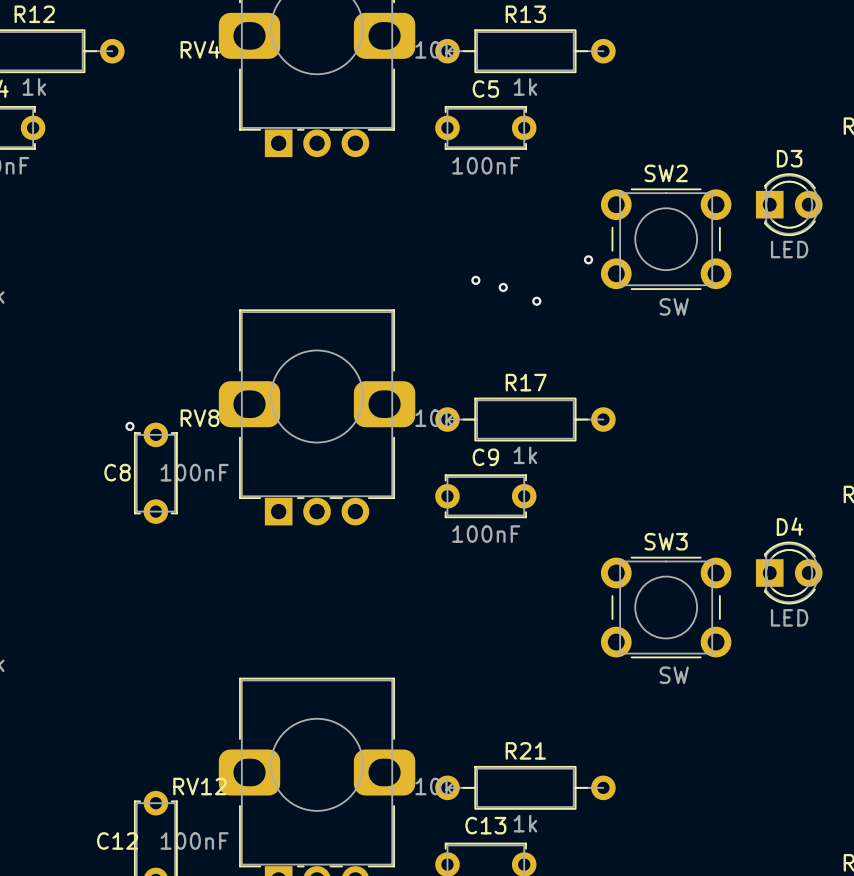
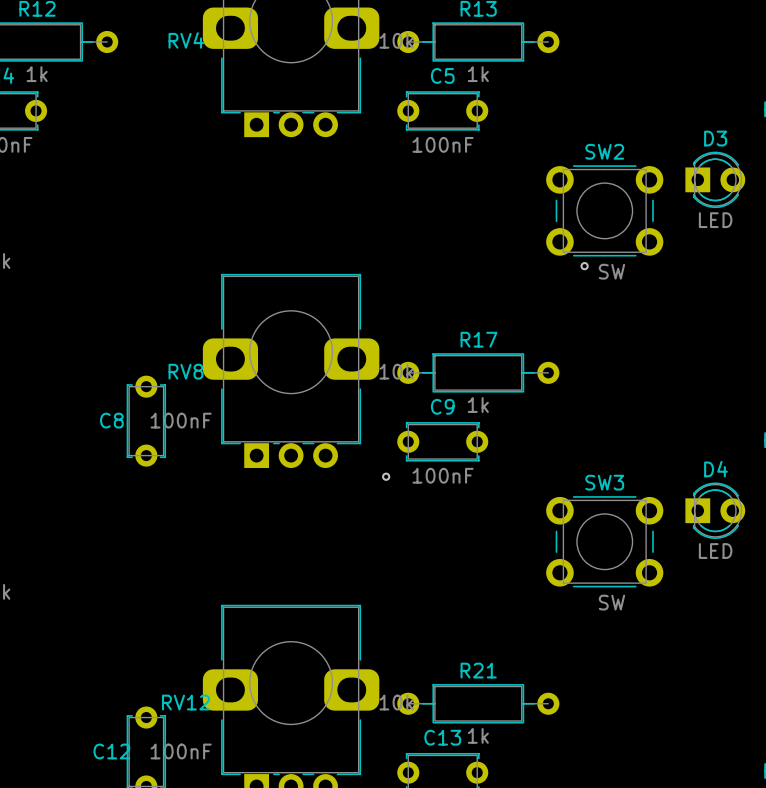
via: (588, 259) -> none
via: (475, 280) -> none
via: (503, 287) -> none
via: none -> (584, 266)
via: (536, 301) -> none
via: (129, 426) -> none
via: none -> (386, 476)

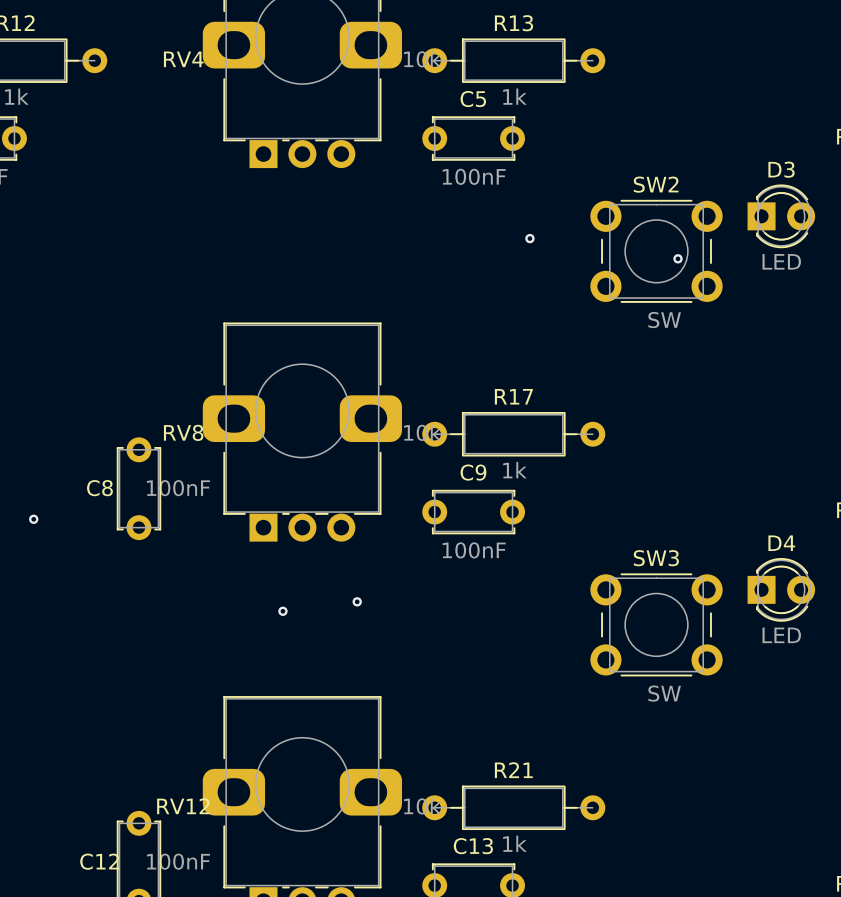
via: none -> (529, 238)
via: none -> (678, 258)
via: (584, 266) -> none
via: none -> (33, 519)
via: (386, 476) -> none
via: none -> (357, 601)
via: none -> (282, 611)

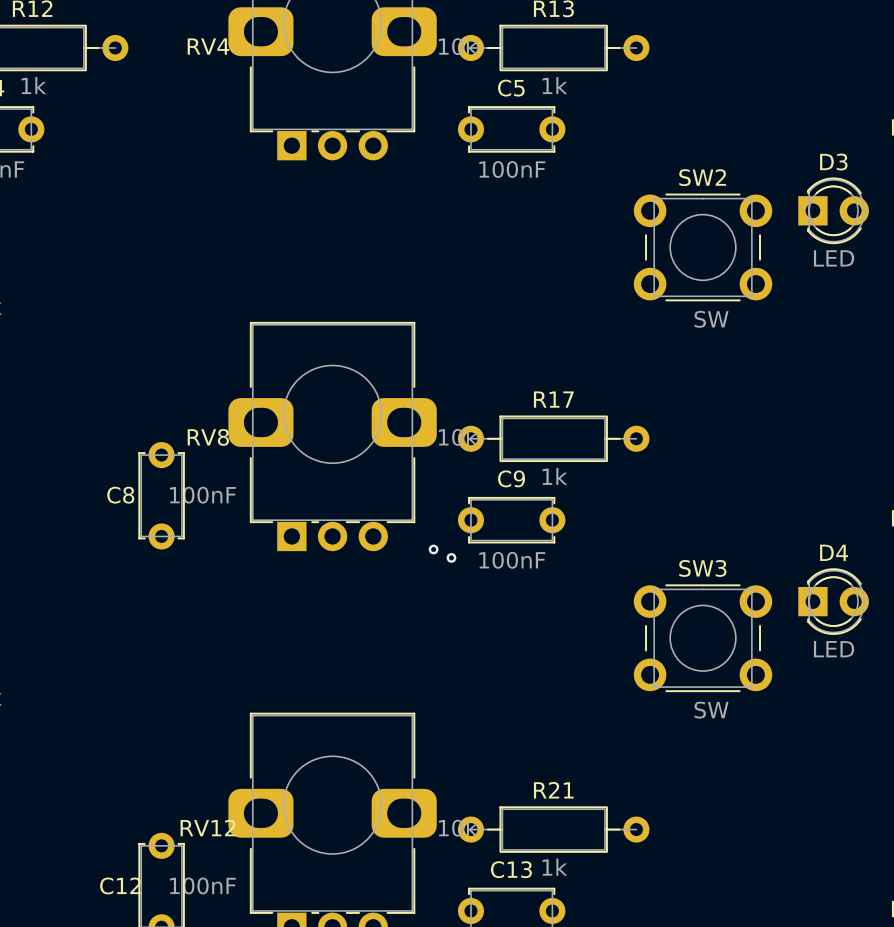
via: (529, 238) -> none
via: (678, 258) -> none
via: (33, 519) -> none
via: none -> (433, 549)
via: none -> (451, 557)
via: (357, 601) -> none
via: (282, 611) -> none

